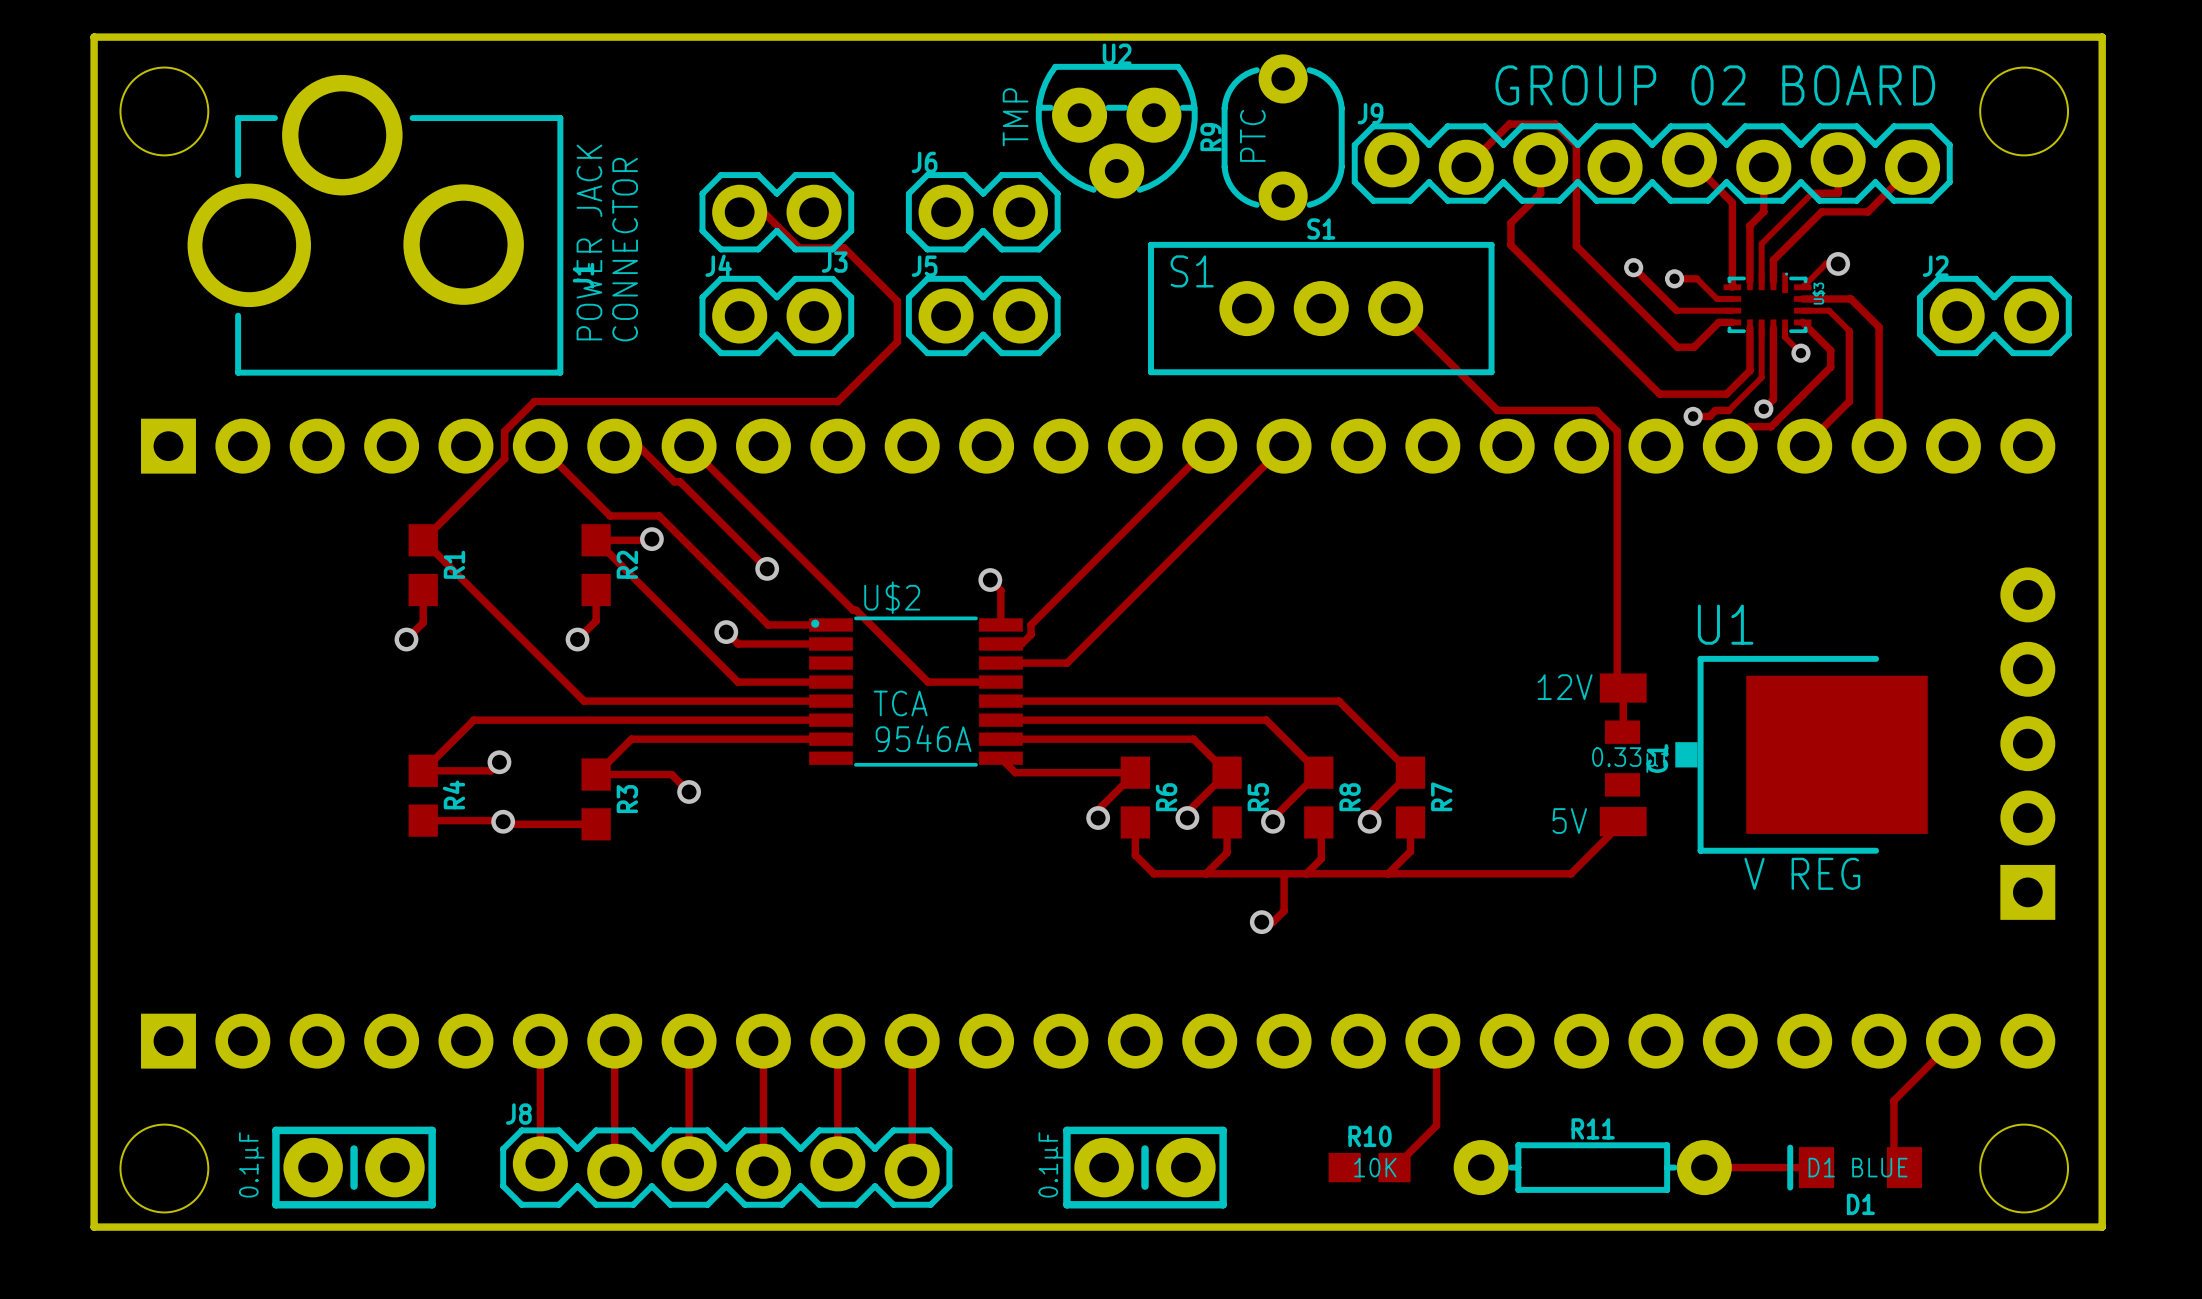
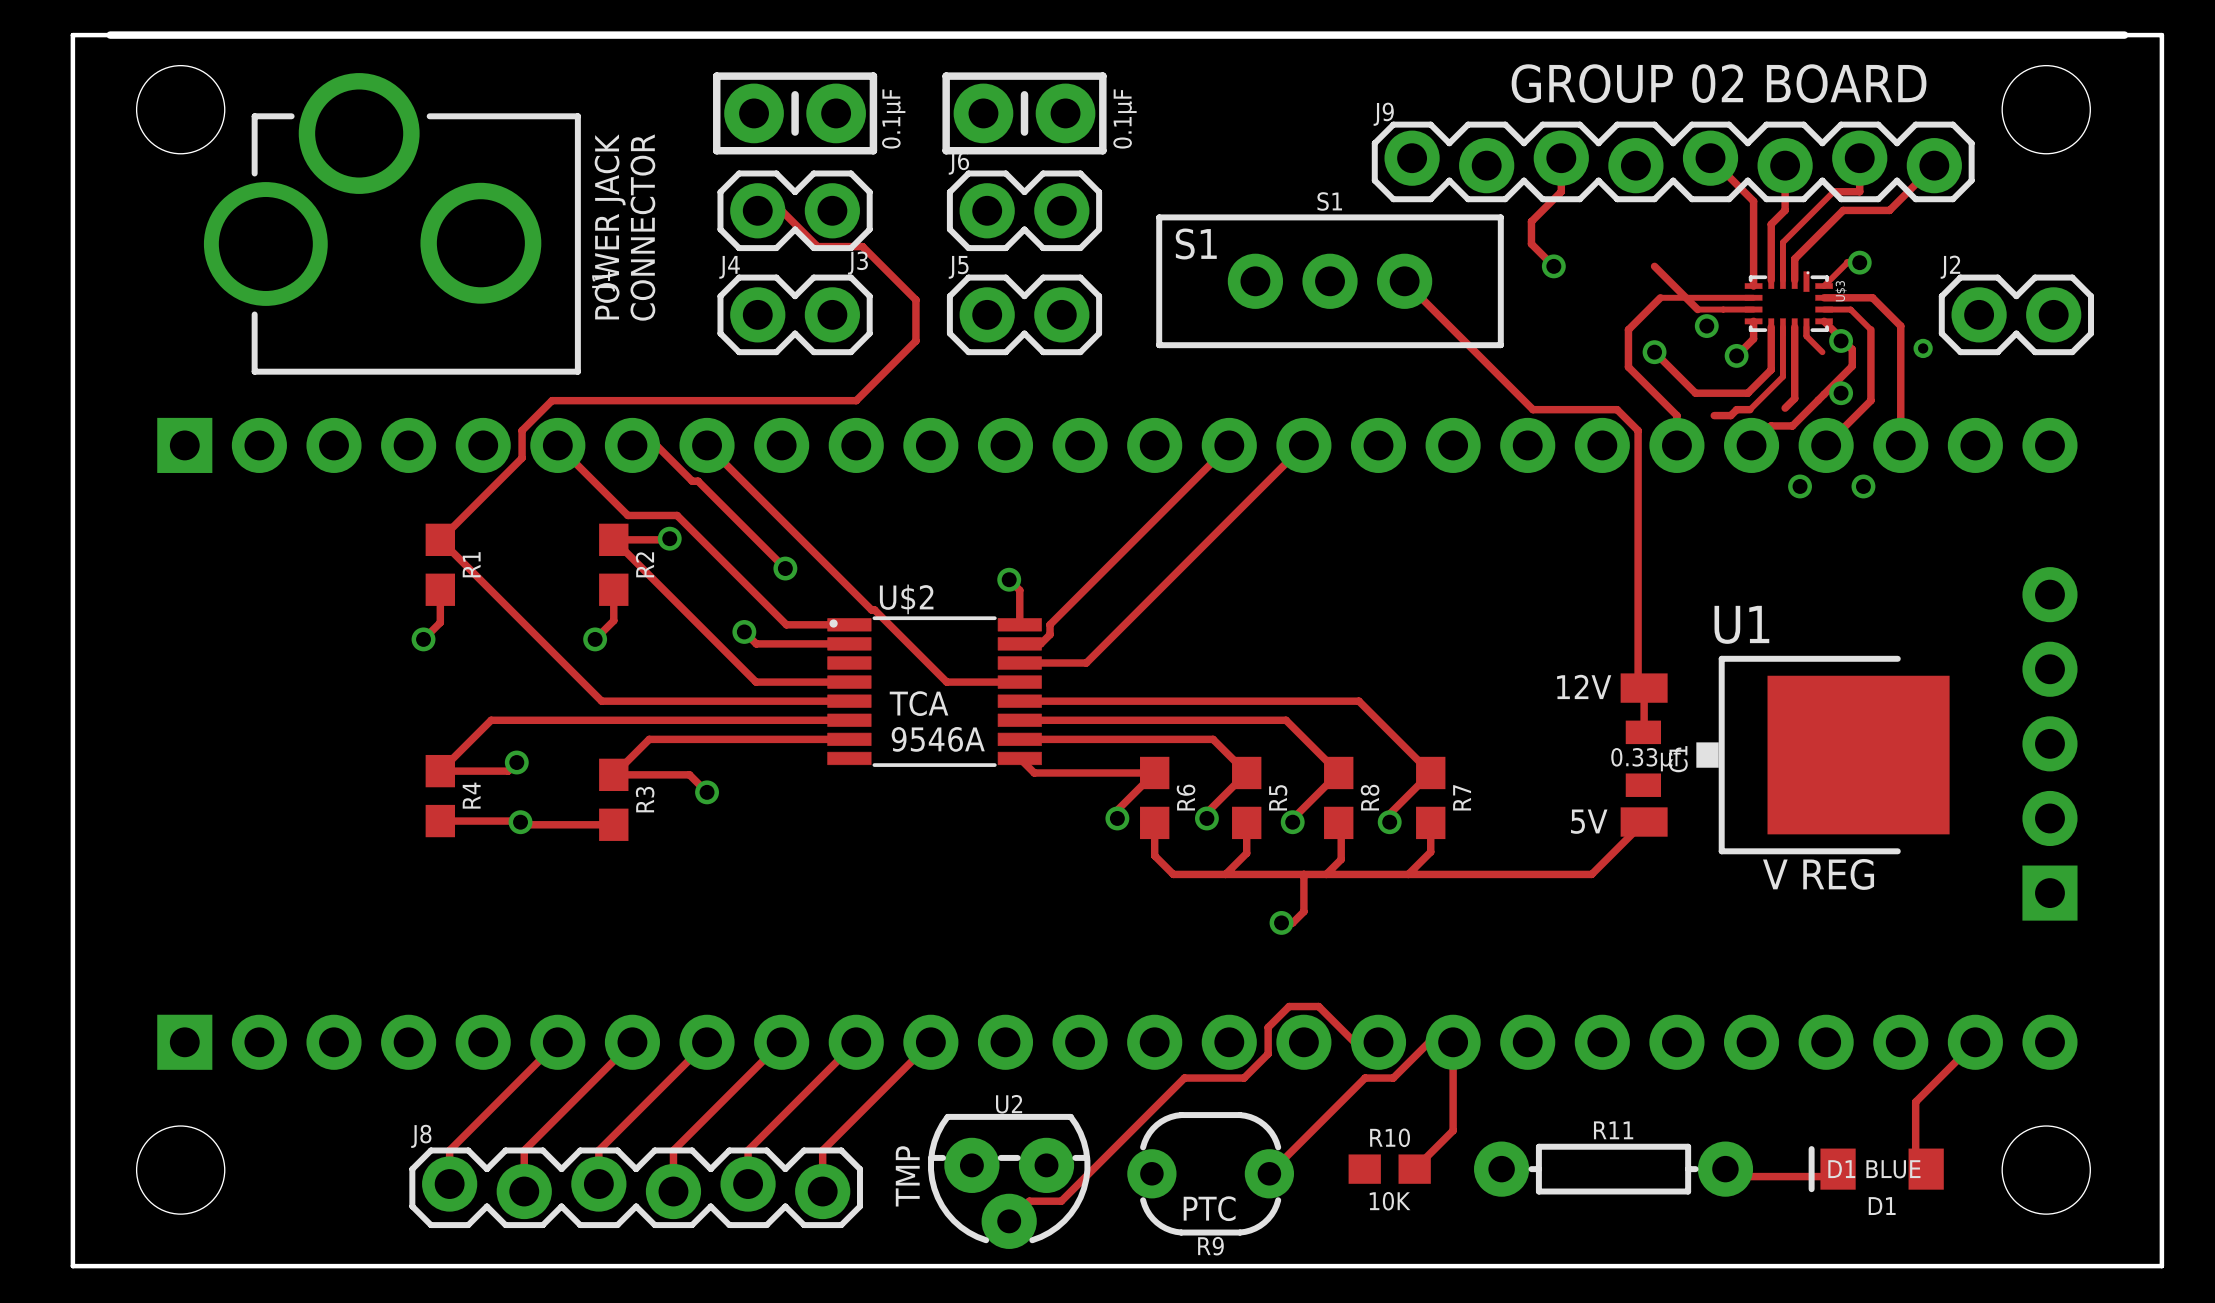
board edge: (94, 37) (94, 1227) (2102, 1227) (2102, 37) -> (110, 35) (72, 35) (72, 1266) (2161, 1266) (2161, 35) (2124, 35)
part: none -> (795, 113)
part: none -> (1024, 113)
text: TMP (1015, 117) -> none
text: none -> 0.1μF (893, 119)
text: none -> 0.1μF (1125, 119)
U2 position: (1116, 131) -> (1009, 1181)
text: PTC (1252, 135) -> none
R9 name position: R9 (1211, 137) -> R9 (1210, 1246)
R9 rotation: 0° (1283, 137) -> 90° clockwise (1210, 1173)
R9 position: (1283, 137) -> (1210, 1173)
track: (1466, 167) (1509, 124) (1555, 124) (1576, 145) (1576, 246) (1677, 347) (1694, 347) (1718, 322) (1732, 322) -> (1736, 355) (1753, 338) (1753, 321)
J6 position: (983, 212) -> (1024, 210)
text position: POWER JACK (589, 242) -> POWER JACK (610, 226)
text position: CONNECTOR (625, 249) -> CONNECTOR (642, 227)
track: (1533, 267) (1659, 394) (1674, 394) -> (1654, 352) (1695, 393)
via: none -> (1553, 266)
via: (1633, 267) -> none
text position: S1 (1192, 271) -> S1 (1196, 244)
track: (1674, 278) (1696, 278) (1717, 298) -> (1676, 445) (1676, 415) (1628, 367) (1628, 329) (1660, 297) (1738, 297)
via: (1674, 278) -> none
S1 position: (1321, 308) -> (1330, 281)
track: (1395, 308) (1497, 410) (1512, 410) -> (1404, 281) (1533, 409)
J5 position: (983, 316) -> (1024, 314)
via: none -> (1706, 326)
via: none -> (1923, 348)
via: none -> (1654, 352)
via position: (1800, 353) -> (1841, 340)
via: none -> (1736, 355)
via: none -> (1841, 393)
via: (1763, 408) -> none
via: (1693, 416) -> none
via: none -> (1800, 486)
via: none -> (1863, 486)
track: (540, 1041) (540, 1163) -> (557, 1042) (449, 1150) (449, 1184)
track: (614, 1041) (614, 1171) -> (632, 1042) (524, 1150) (524, 1191)
track: (689, 1041) (689, 1163) -> (707, 1042) (598, 1150) (598, 1184)
track: (763, 1041) (763, 1171) -> (781, 1042) (673, 1150) (673, 1191)
track: (837, 1041) (837, 1163) -> (856, 1042) (748, 1150) (748, 1184)
track: (912, 1041) (912, 1171) -> (930, 1042) (822, 1150) (822, 1191)
track: none -> (1378, 1042) (1354, 1042) (1318, 1006) (1289, 1006) (1268, 1027) (1268, 1054) (1244, 1078) (1184, 1078) (1061, 1201) (1029, 1201) (1009, 1221)
track: (1432, 1041) (1436, 1044) (1436, 1125) (1432, 1129) -> (1269, 1173) (1365, 1078) (1393, 1078) (1429, 1042) (1453, 1042) (1453, 1130)
text: 0.1μF (251, 1164) -> none
text: 0.1μF (1051, 1164) -> none
part: (354, 1167) -> none
J8 position: (726, 1167) -> (636, 1187)
part: (1145, 1167) -> none
text position: 10K (1375, 1167) -> 10K (1390, 1201)
track: (1704, 1167) (1816, 1167) -> none
track: none -> (1834, 1172) (1830, 1176) (1721, 1176)
text: none -> TMP (907, 1176)
text: none -> PTC (1209, 1208)

